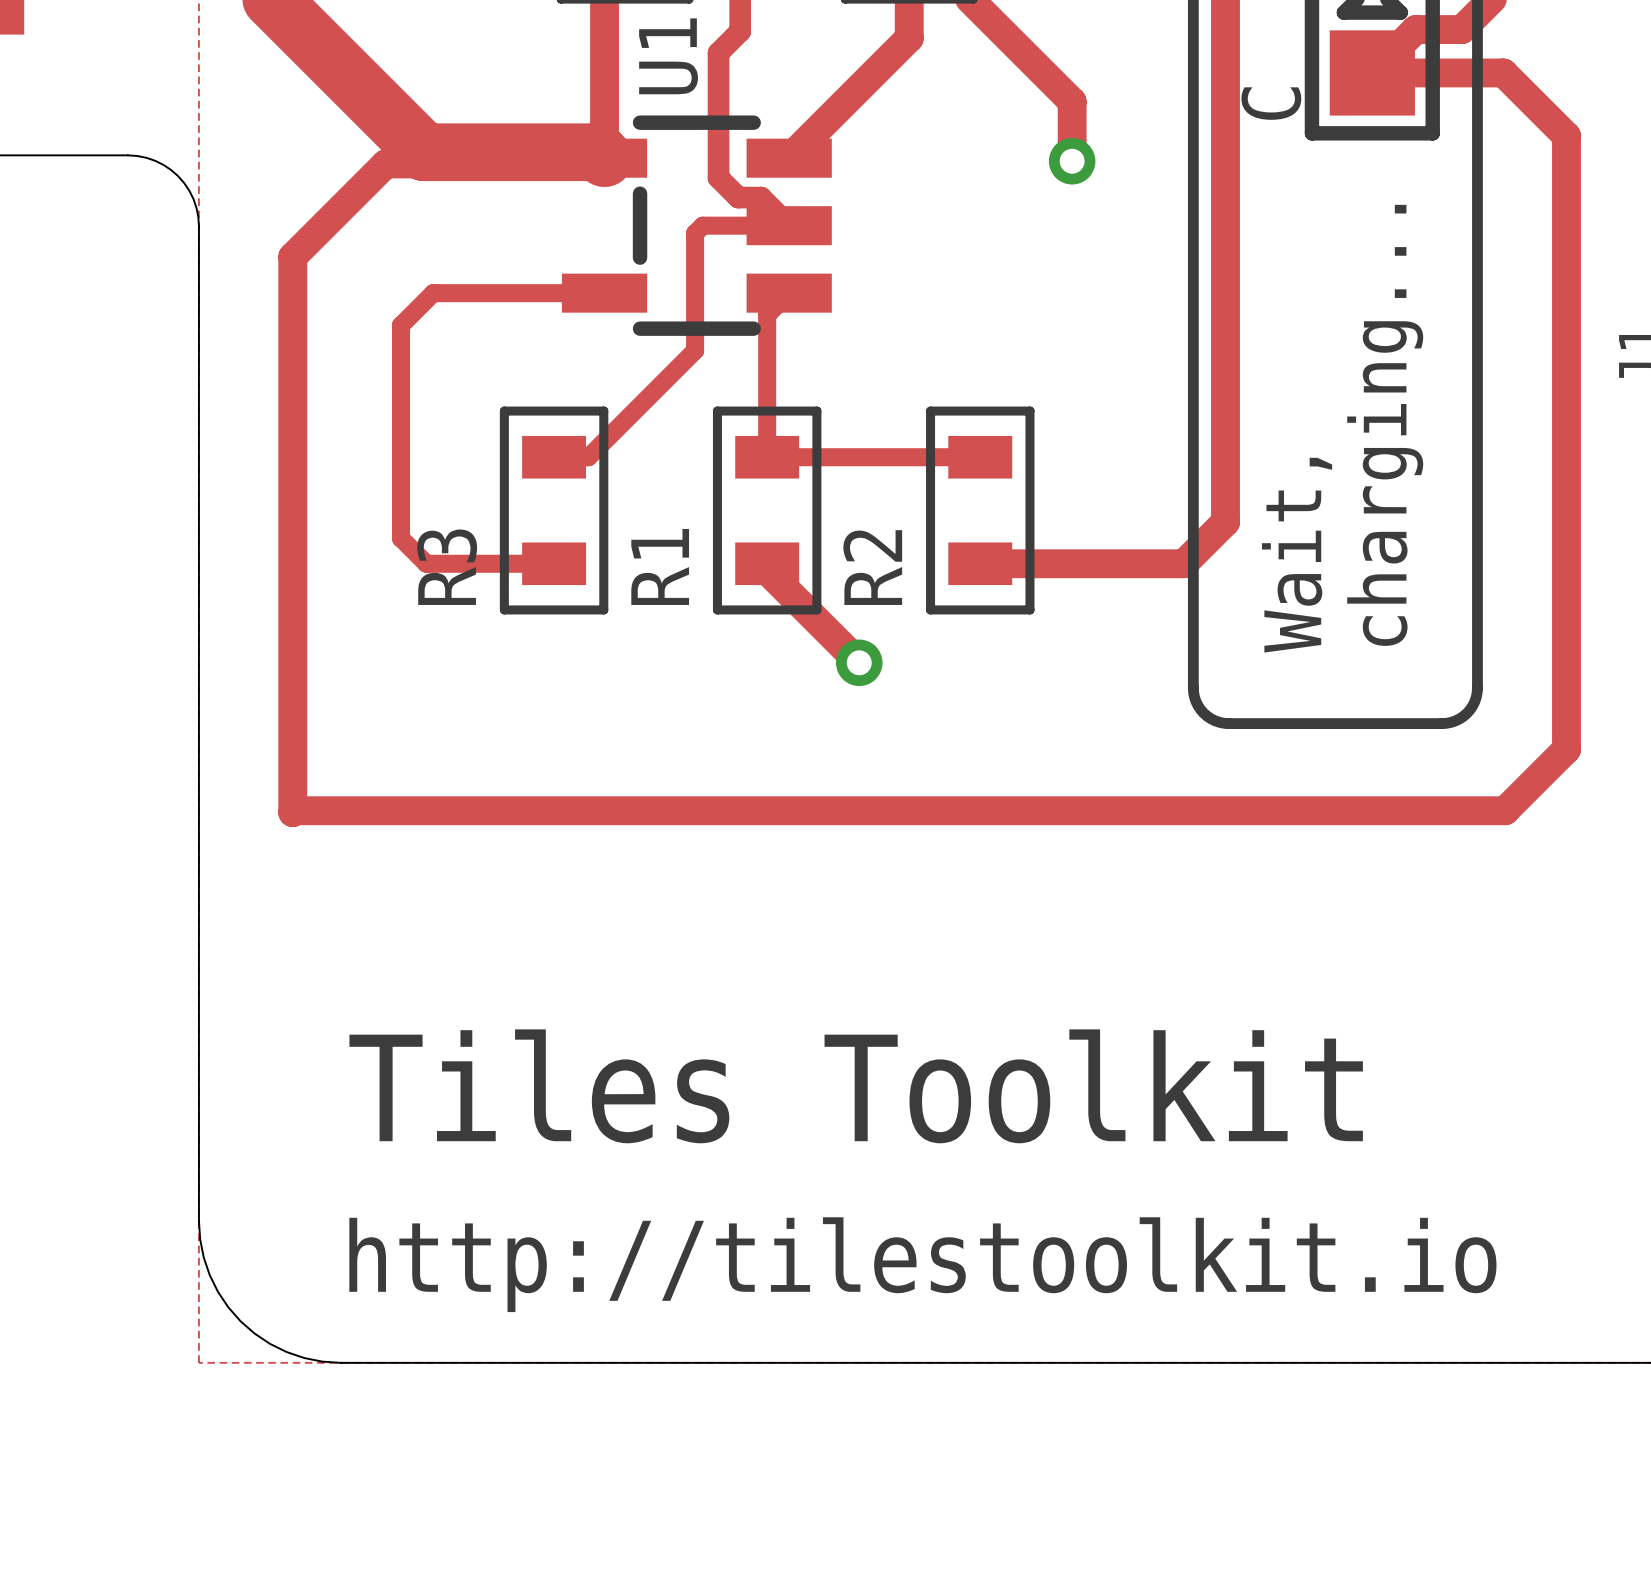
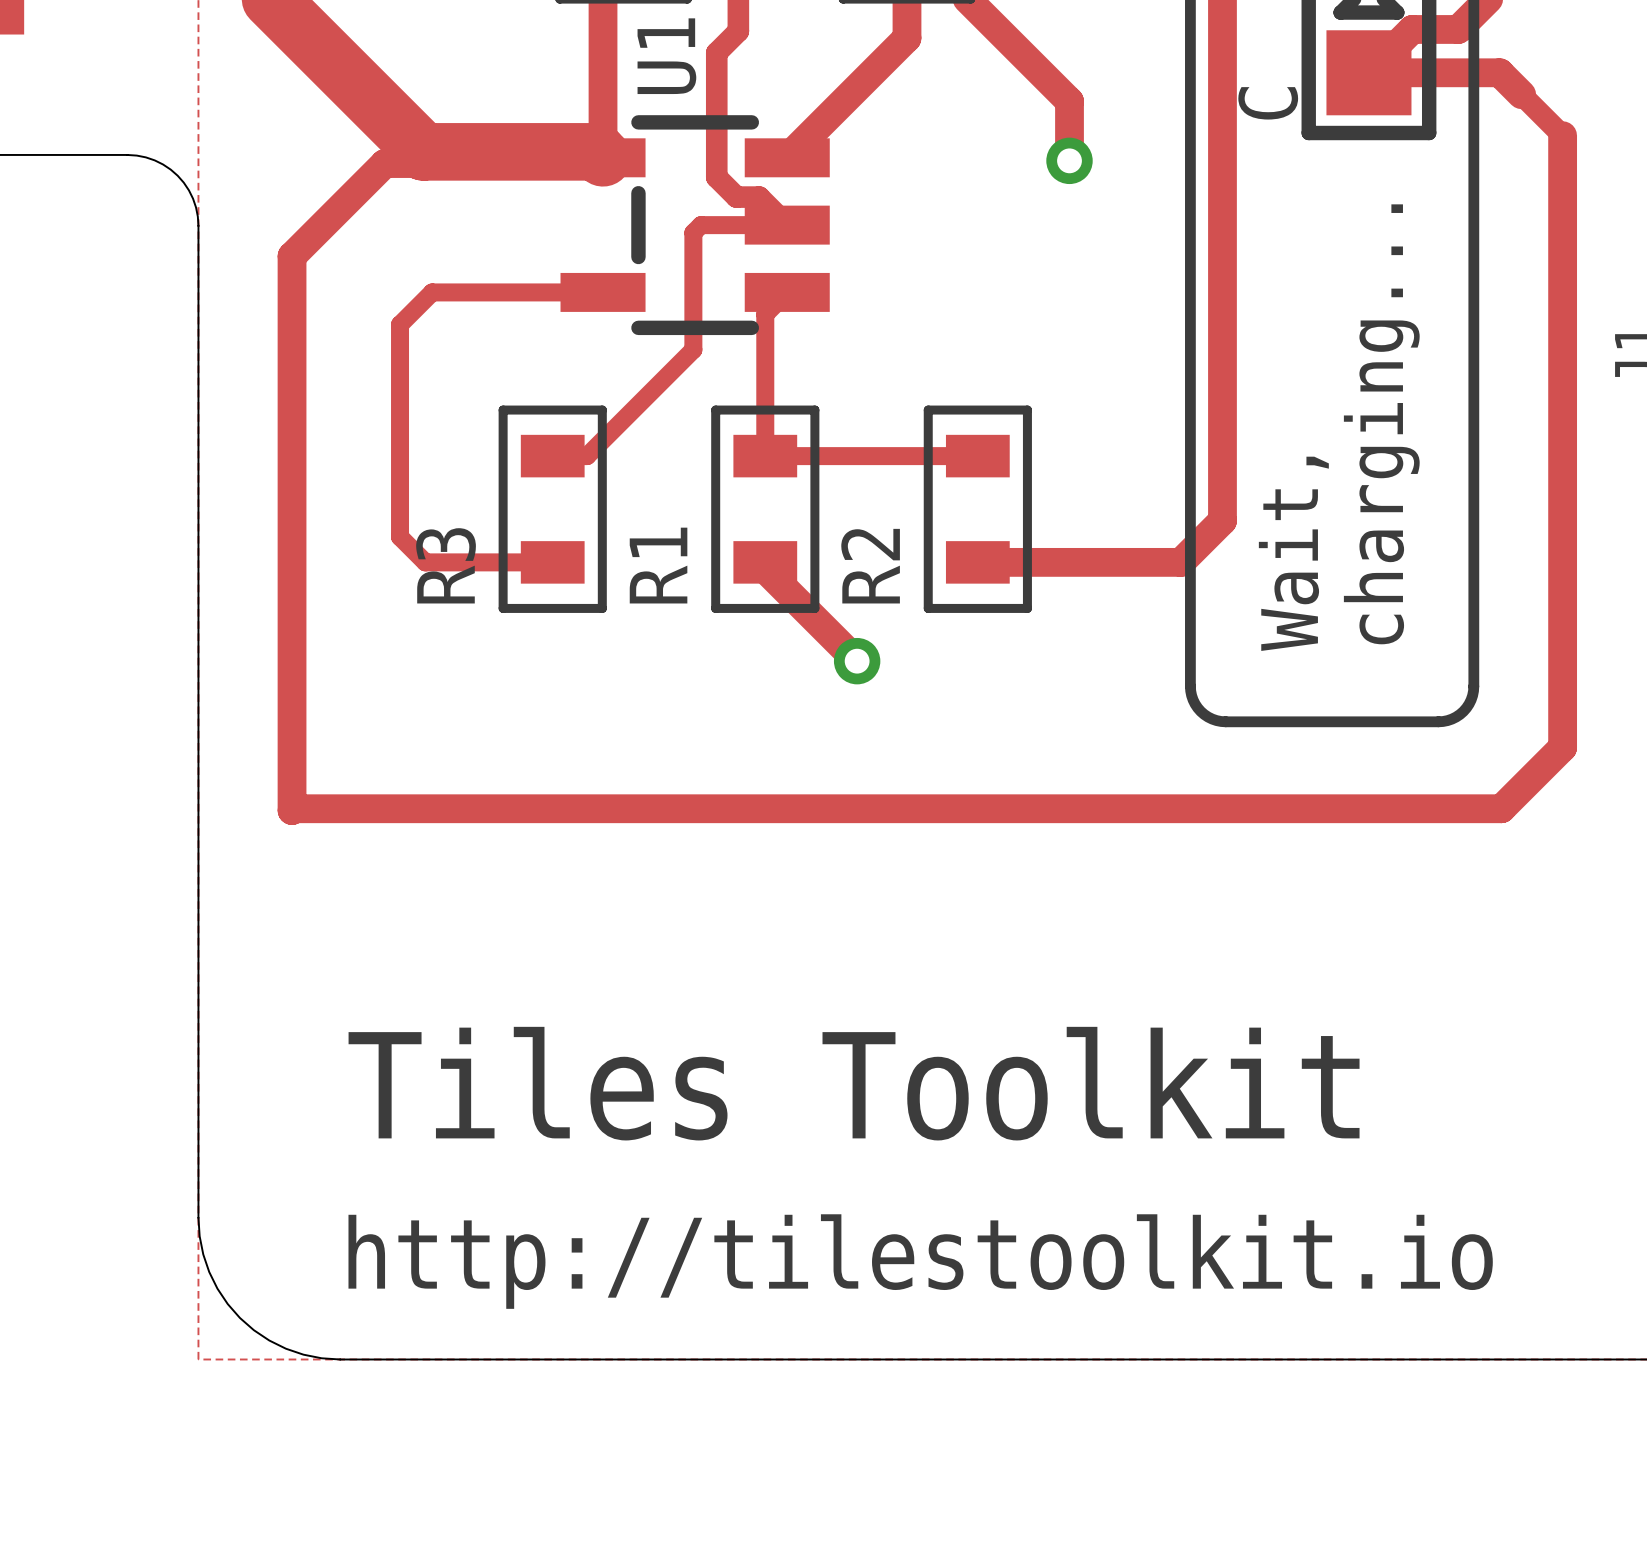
track width: thick (1525, 94) (1566, 135) -> thin (1521, 94) (1562, 135)

